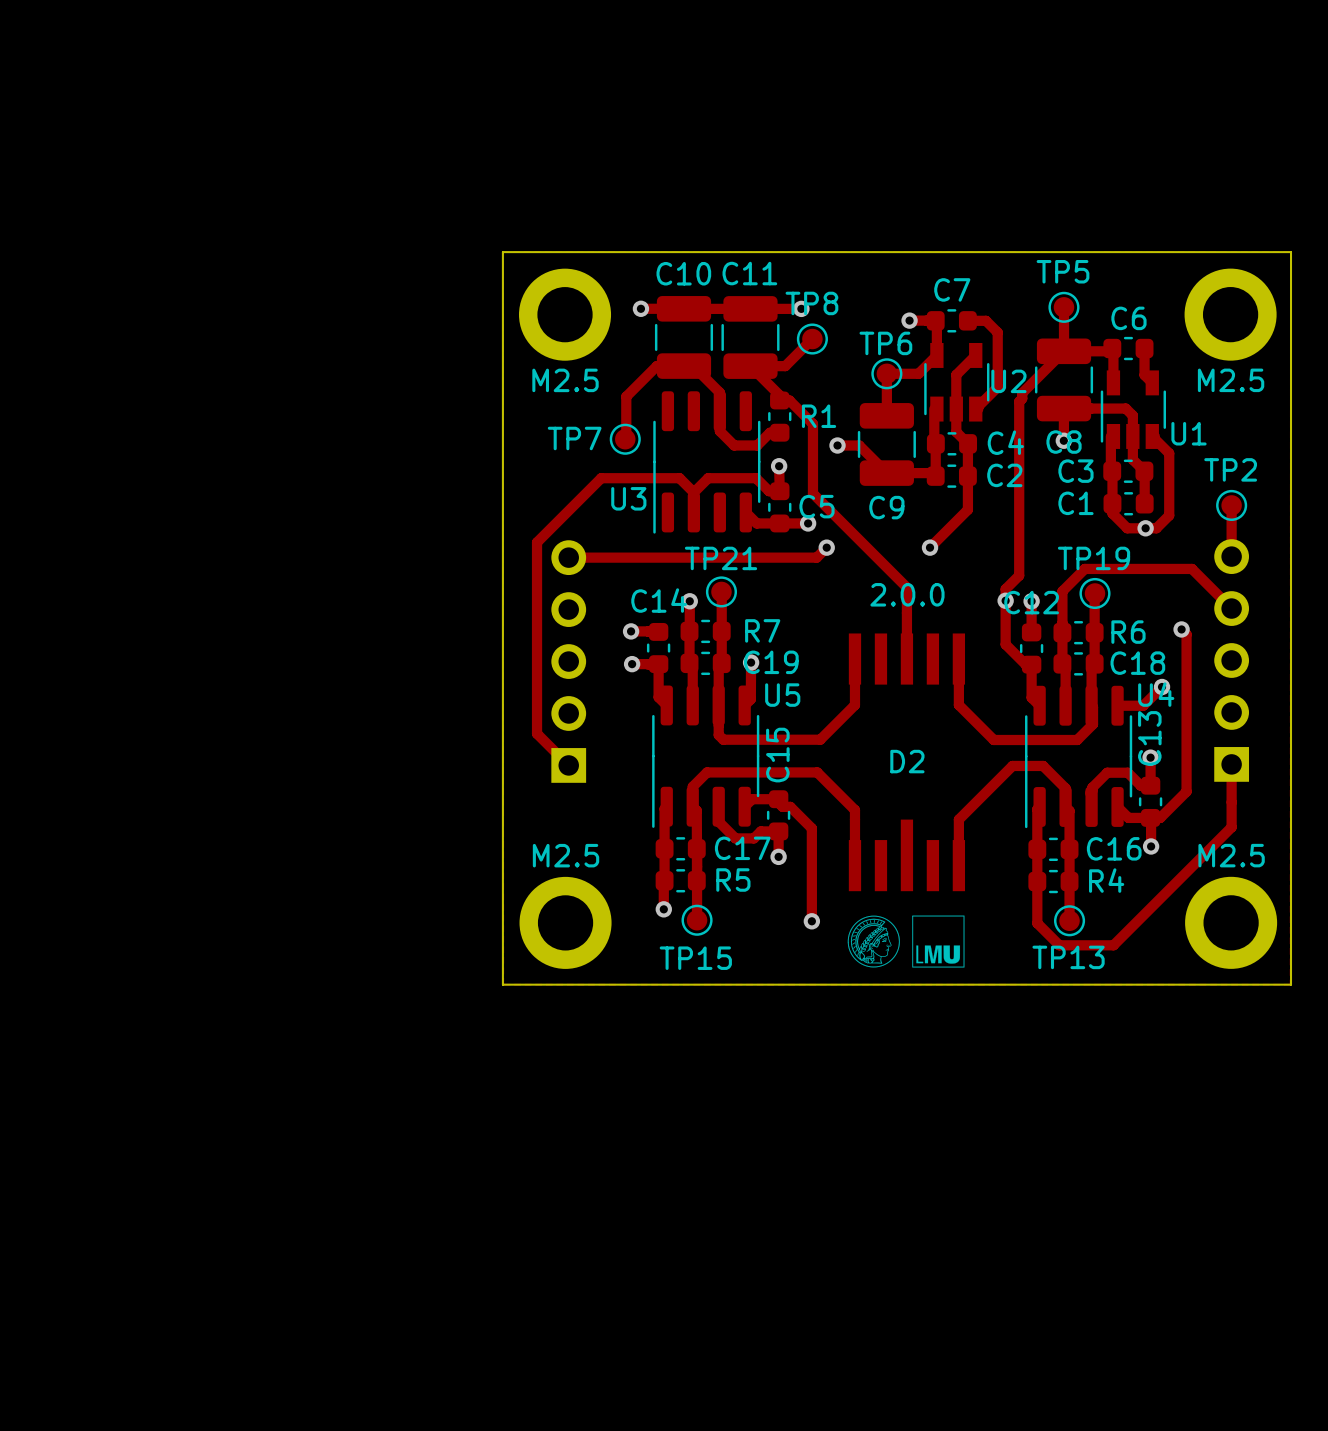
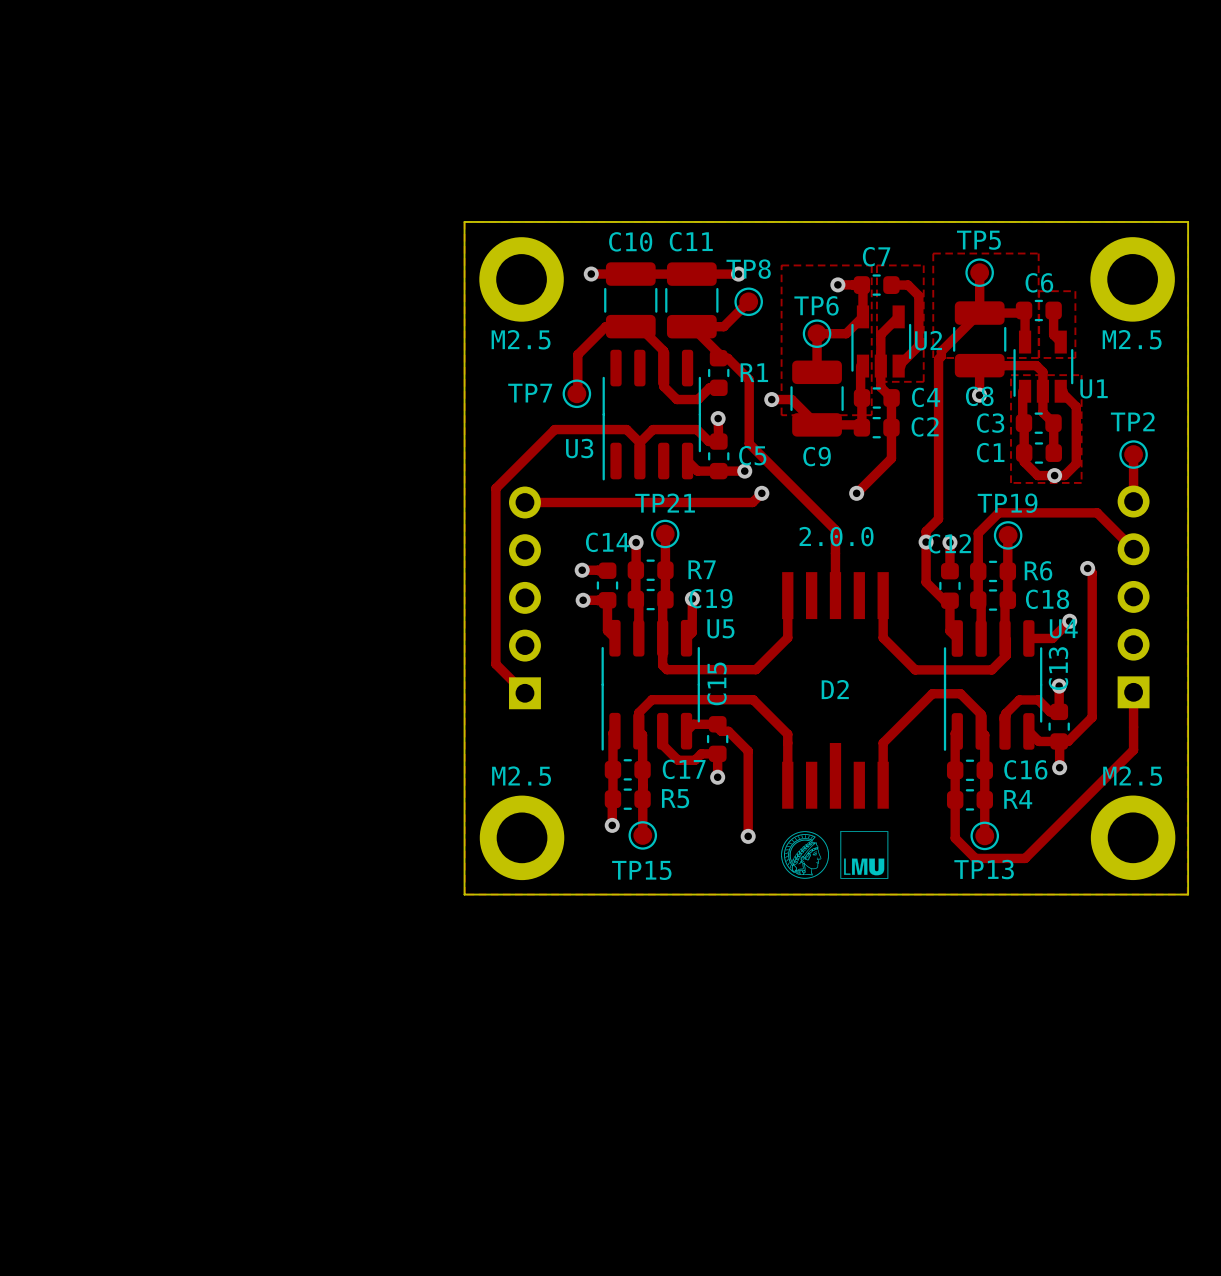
zone outline: none -> (933, 253) (933, 357) (1038, 357) (1038, 253) (933, 253)
zone outline: none -> (781, 265) (781, 415) (871, 415) (871, 265) (781, 265)
zone outline: none -> (876, 265) (923, 265) (923, 381) (876, 381) (876, 265)
zone outline: none -> (1039, 291) (1039, 357) (1075, 357) (1075, 291) (1039, 291)
zone outline: none -> (1011, 375) (1011, 482) (1081, 482) (1081, 375) (1011, 375)

